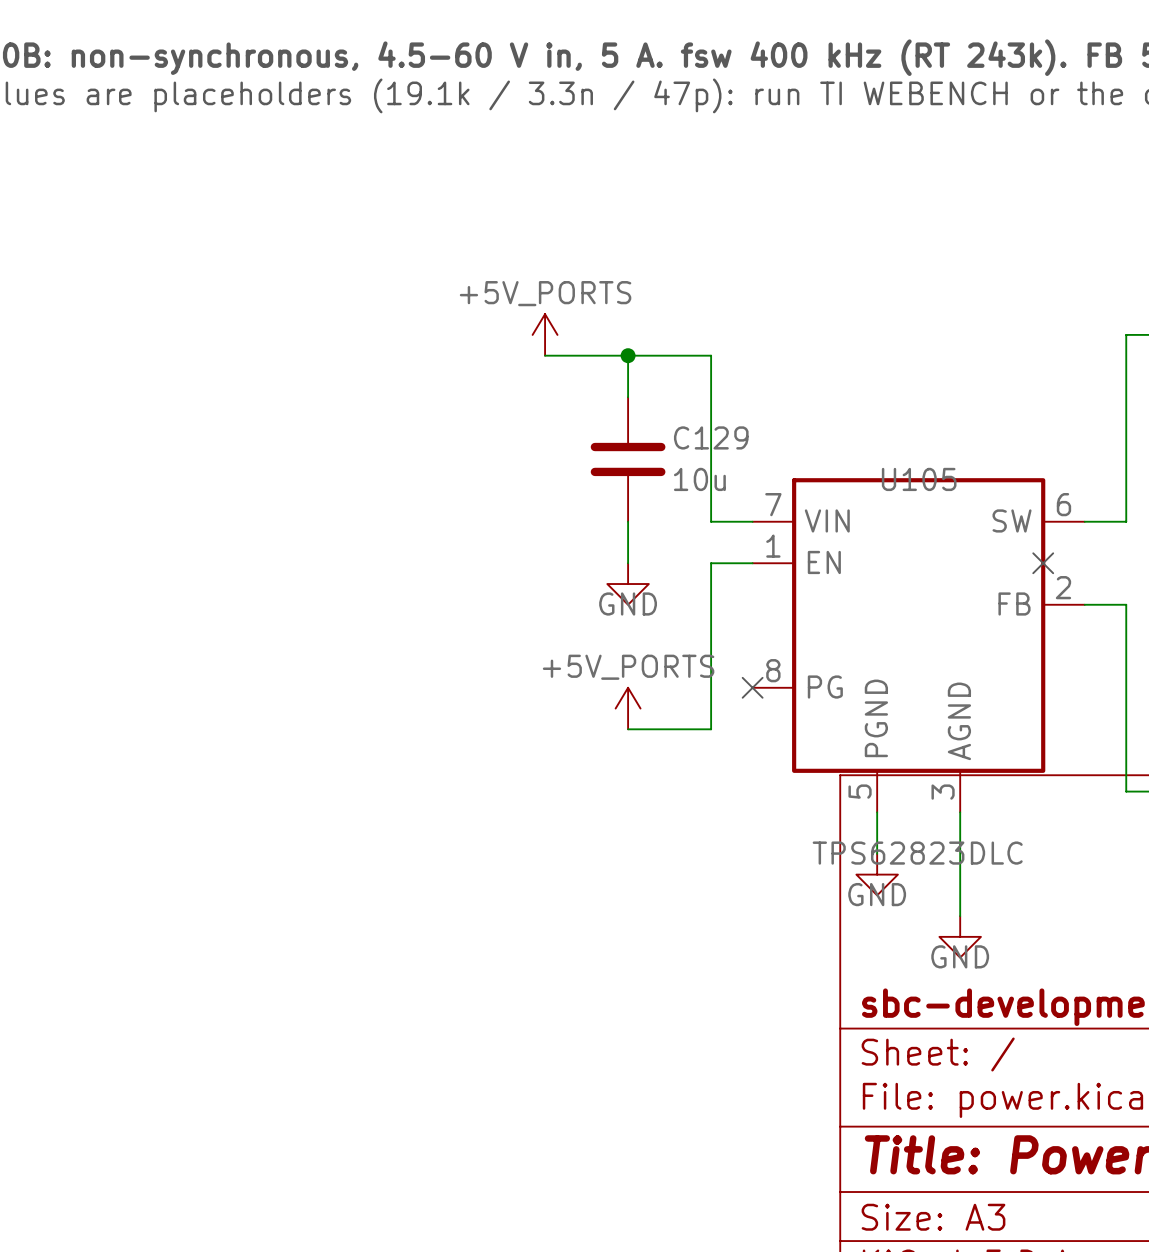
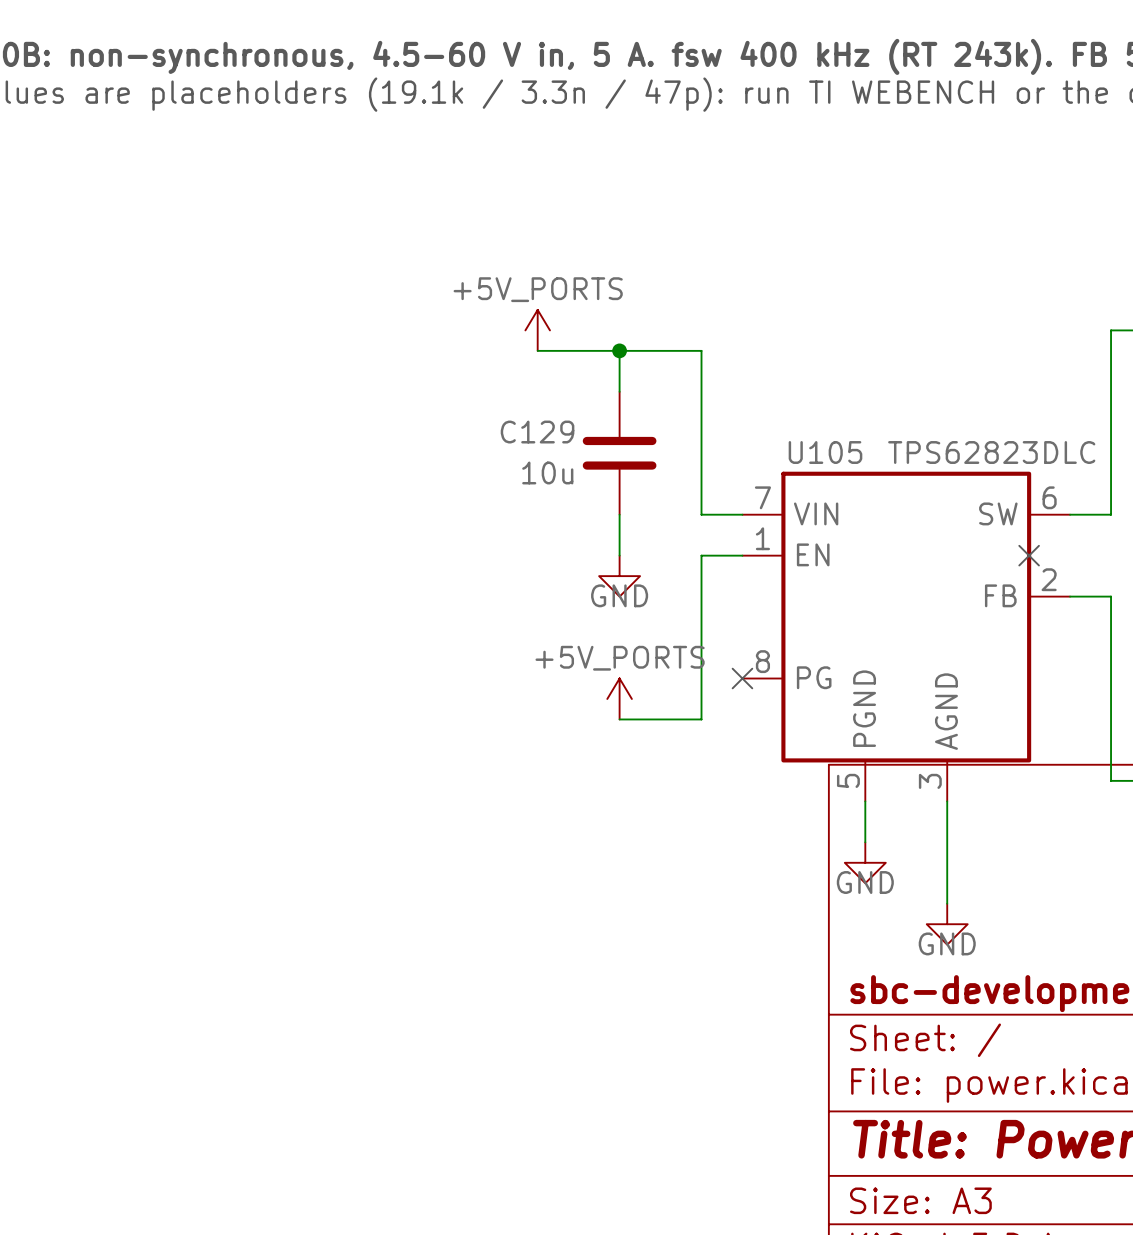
C129 name position: C129 (711, 437) -> C129 (537, 432)
C129 value position: 10u (699, 479) -> 10u (547, 472)
U105 name position: U105 (919, 479) -> U105 (825, 452)
U105 value position: TPS62823DLC (917, 853) -> TPS62823DLC (991, 452)

